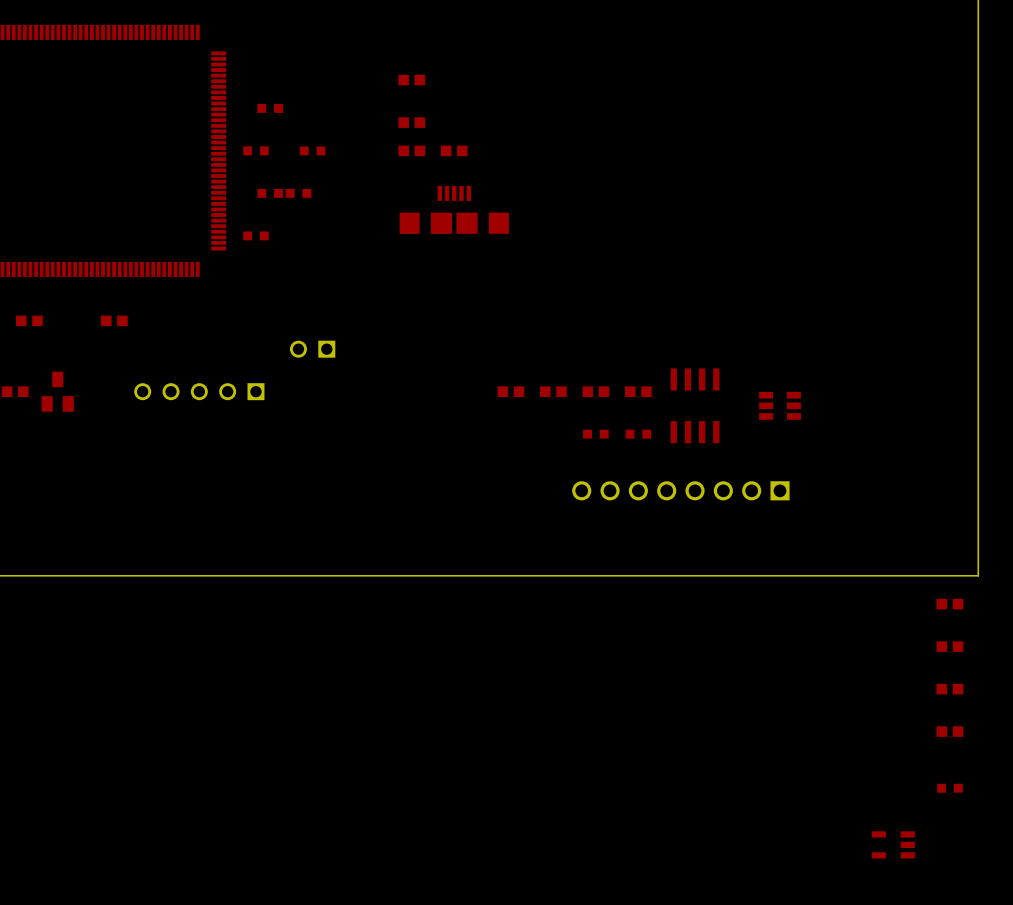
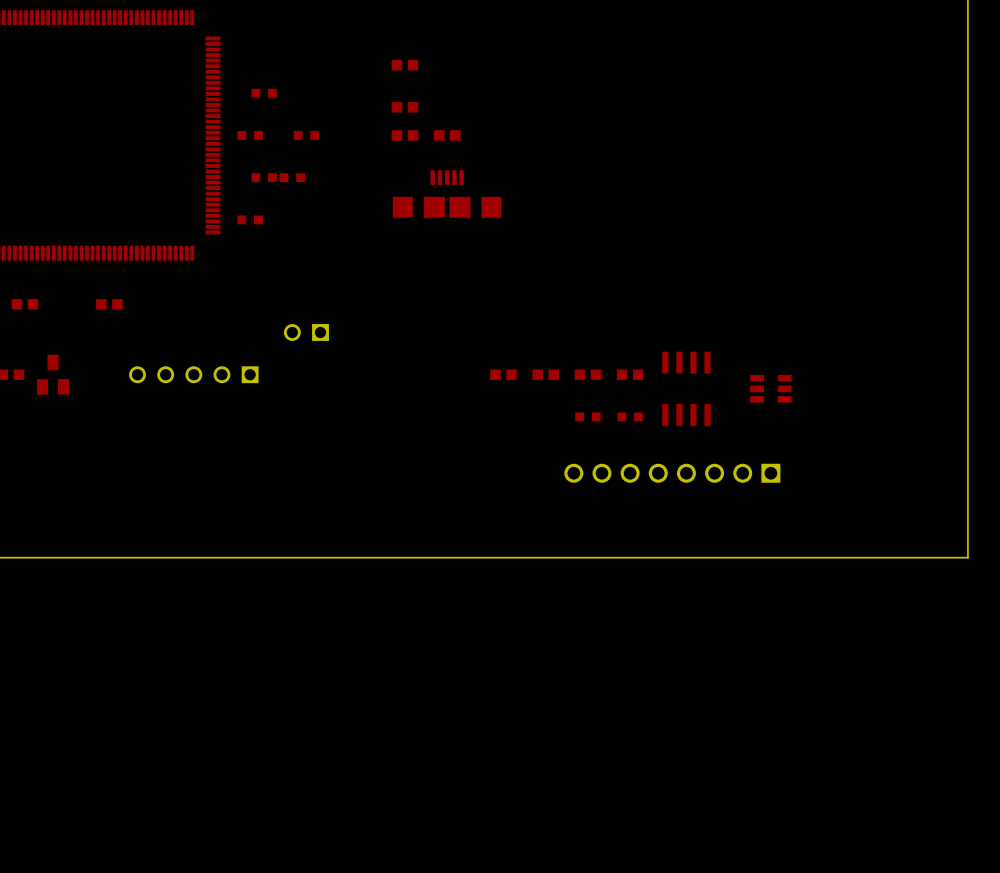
part: (949, 604) -> none
part: (949, 646) -> none
part: (949, 689) -> none
part: (949, 731) -> none
part: (949, 788) -> none
part: (893, 844) -> none

